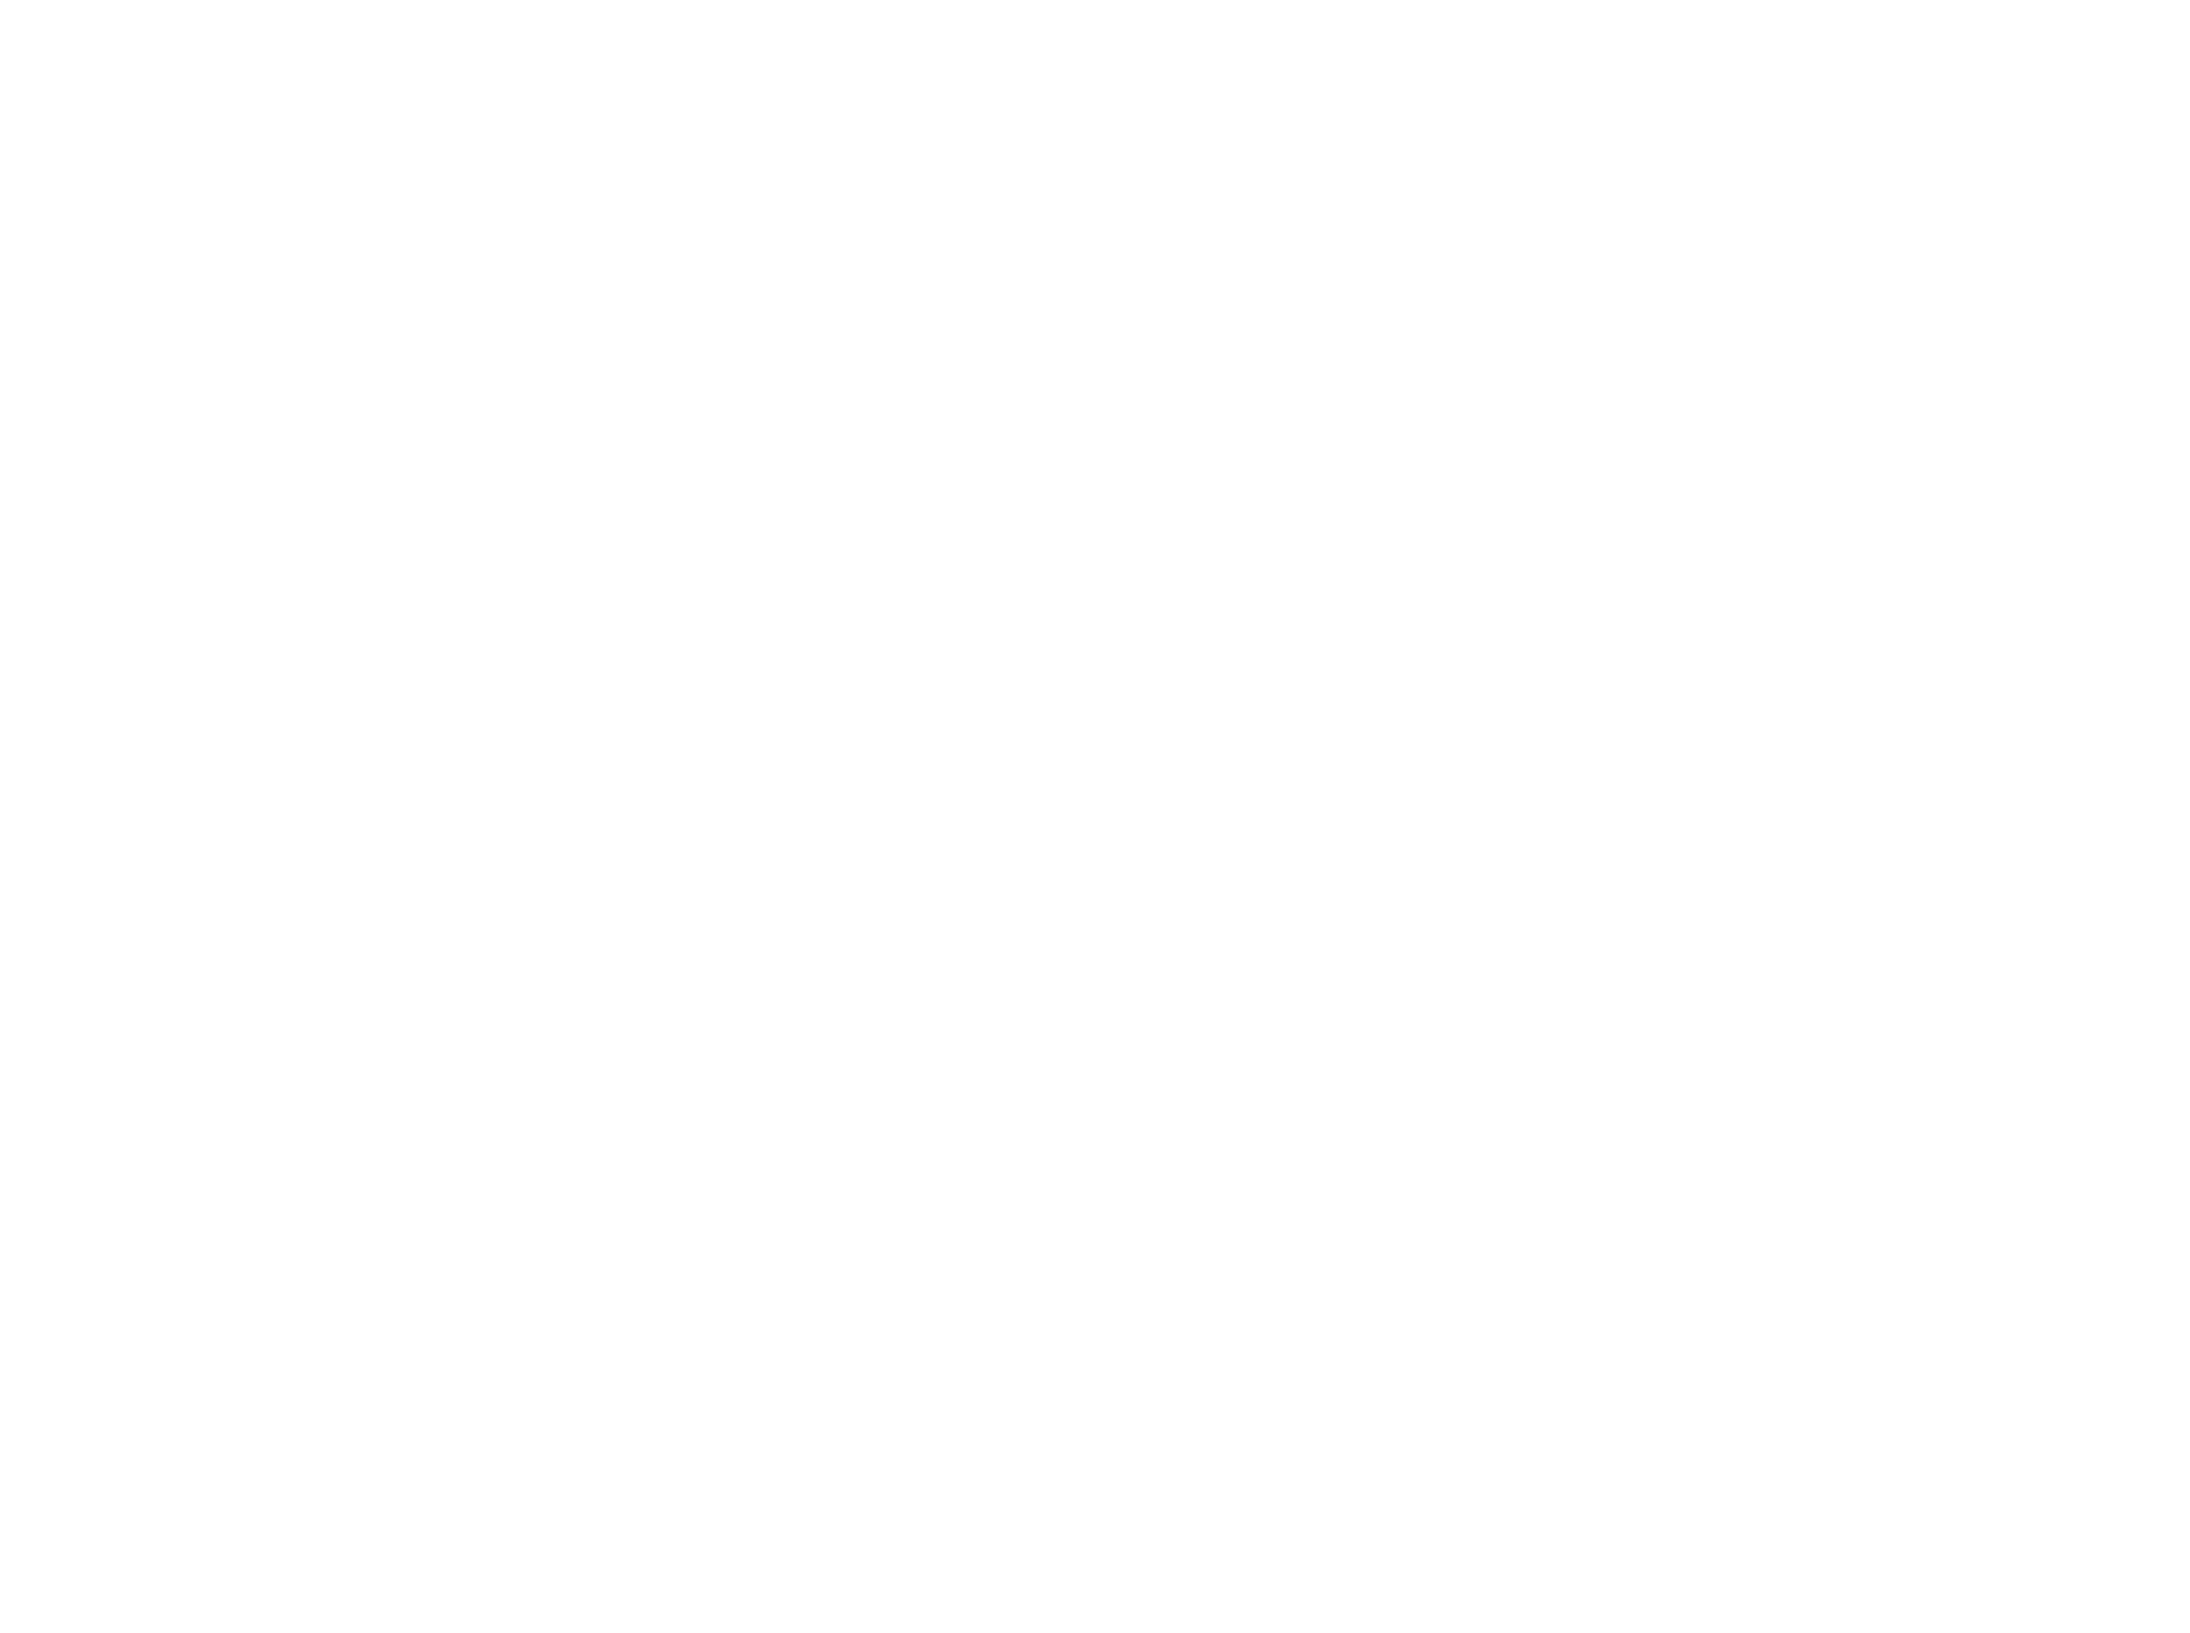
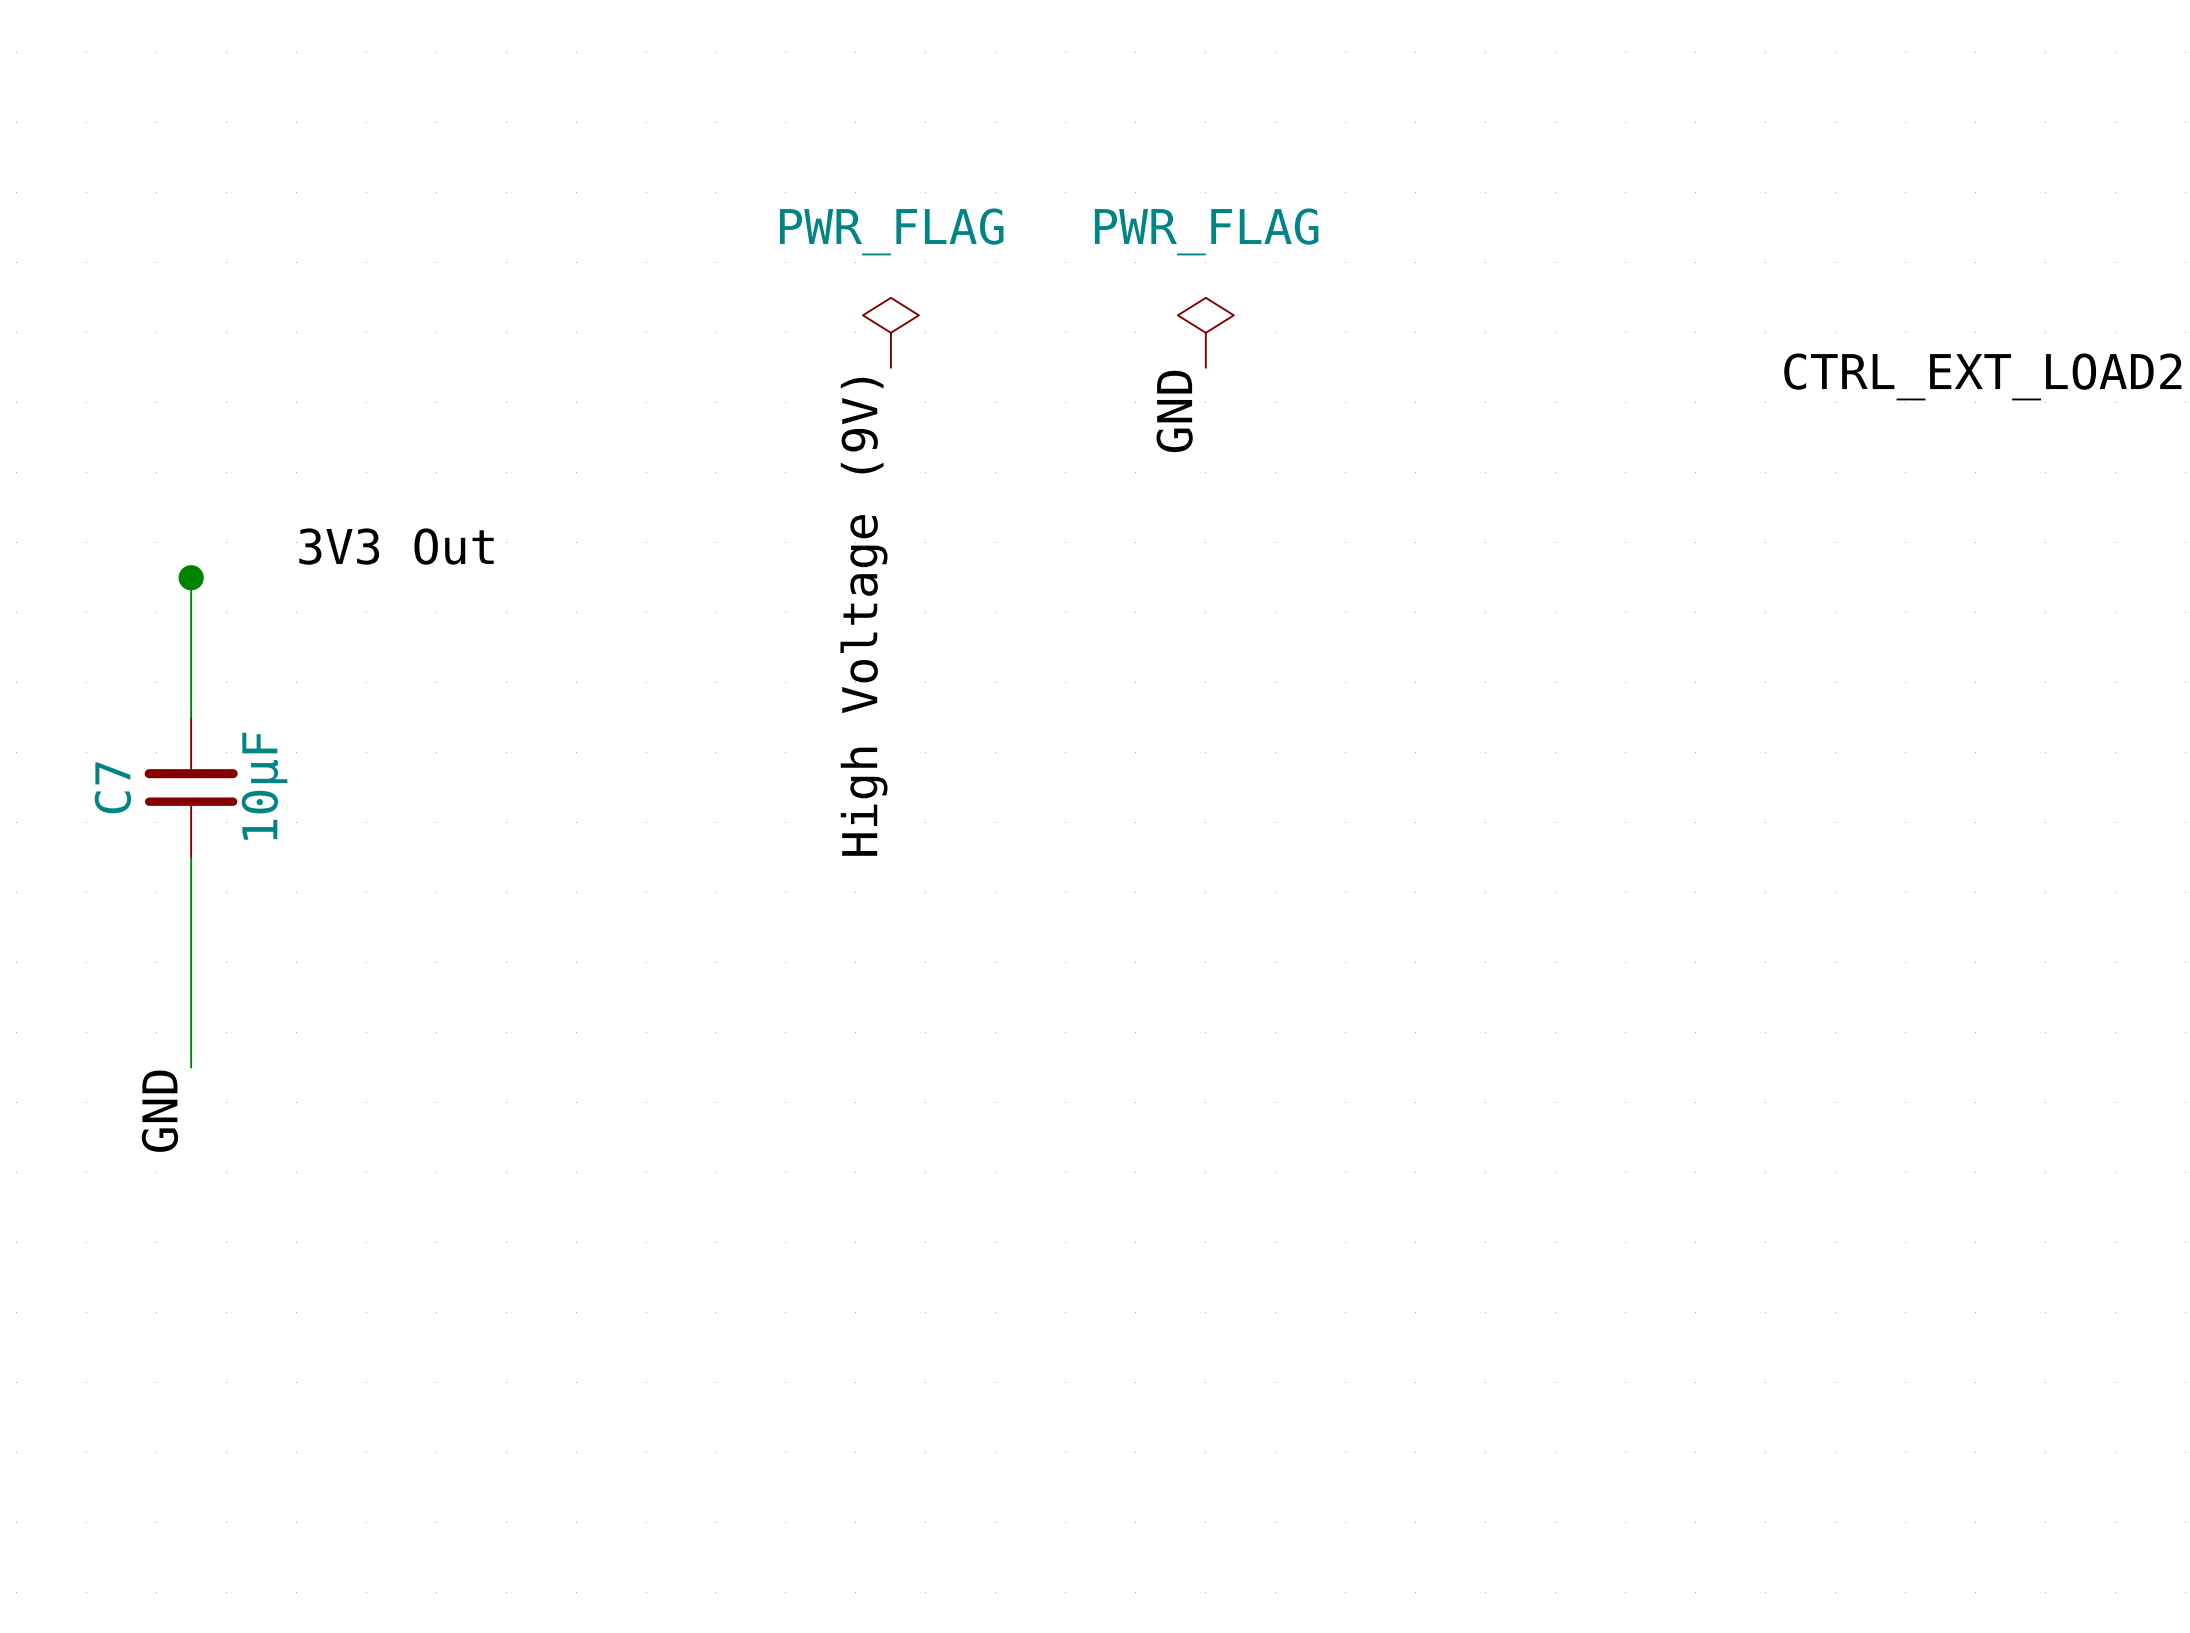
power symbol: none -> PWR_FLAG (890, 332)
power symbol: none -> PWR_FLAG (1205, 332)
label: none -> CTRL_EXT_LOAD2 (1982, 376)
label: none -> GND (1174, 411)
label: none -> 3V3 Out (396, 546)
wire: none -> (191, 577) (191, 717)
junction: none -> (191, 577)
label: none -> High Voltage (9V) (864, 616)
C7: none -> 10μF (191, 787)
wire: none -> (191, 857) (191, 1067)
label: none -> GND (159, 1111)

